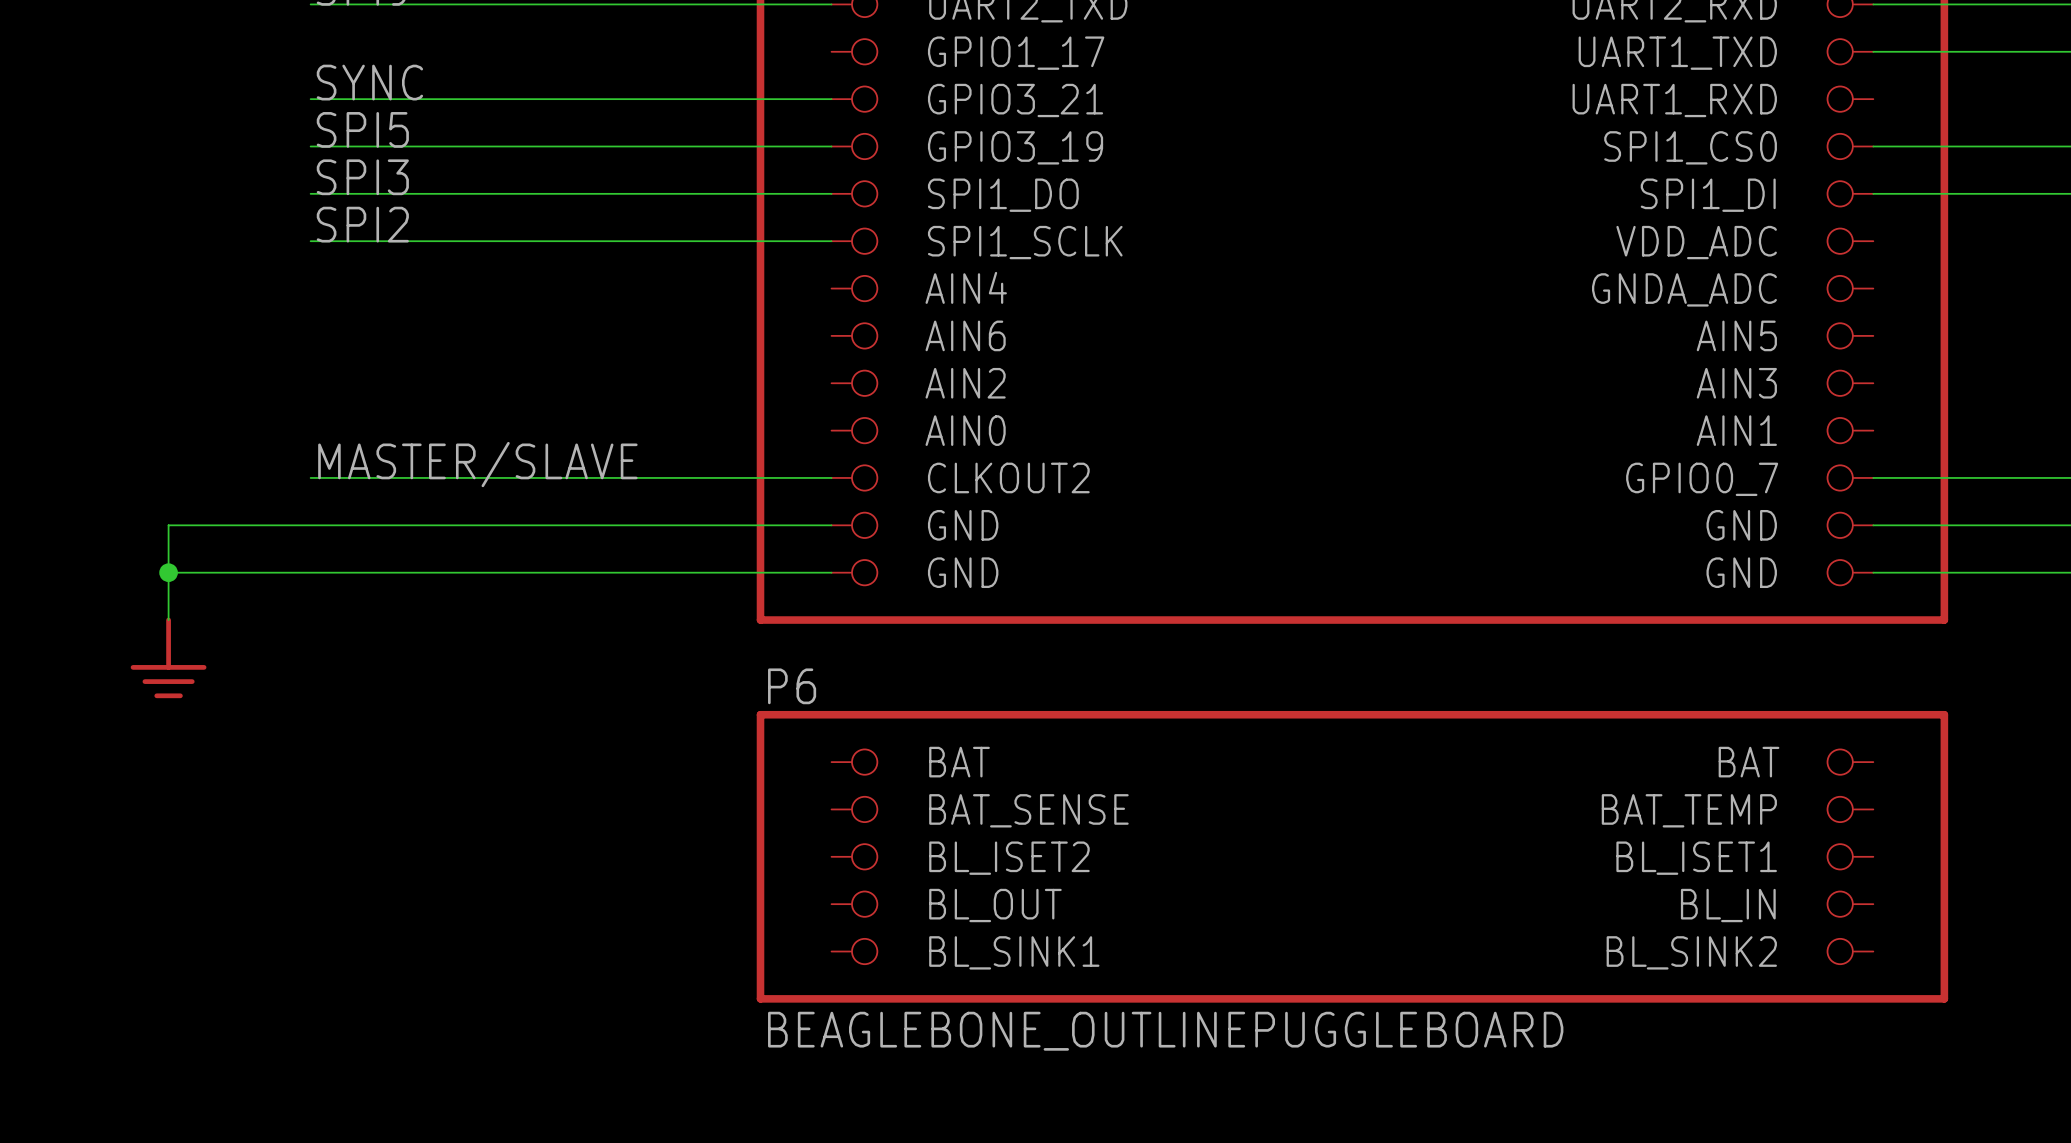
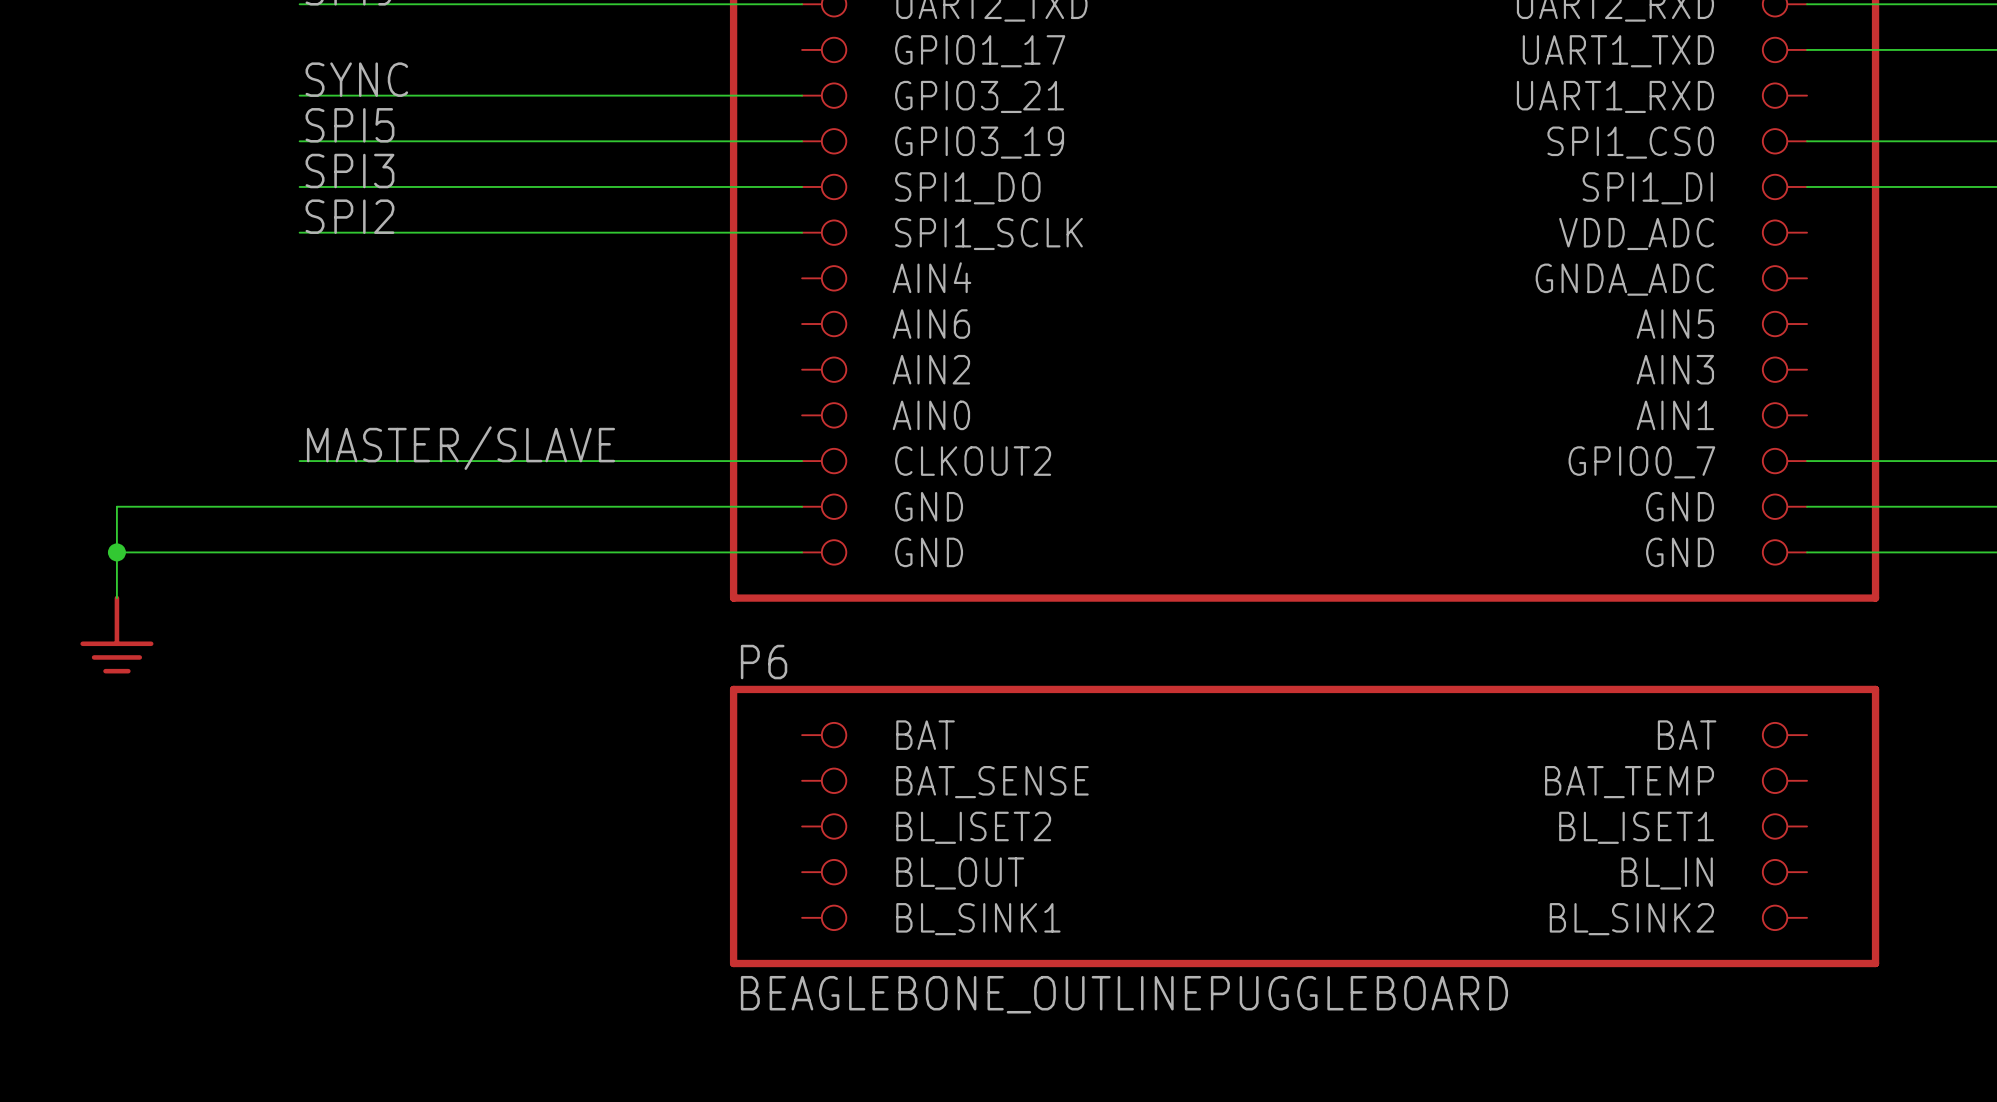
wire: (168, 525) (168, 620) -> (162, 506) (116, 506) (116, 598)
wire: none -> (116, 552) (162, 552)
junction position: (168, 572) -> (116, 552)
part position: (168, 657) -> (116, 634)

